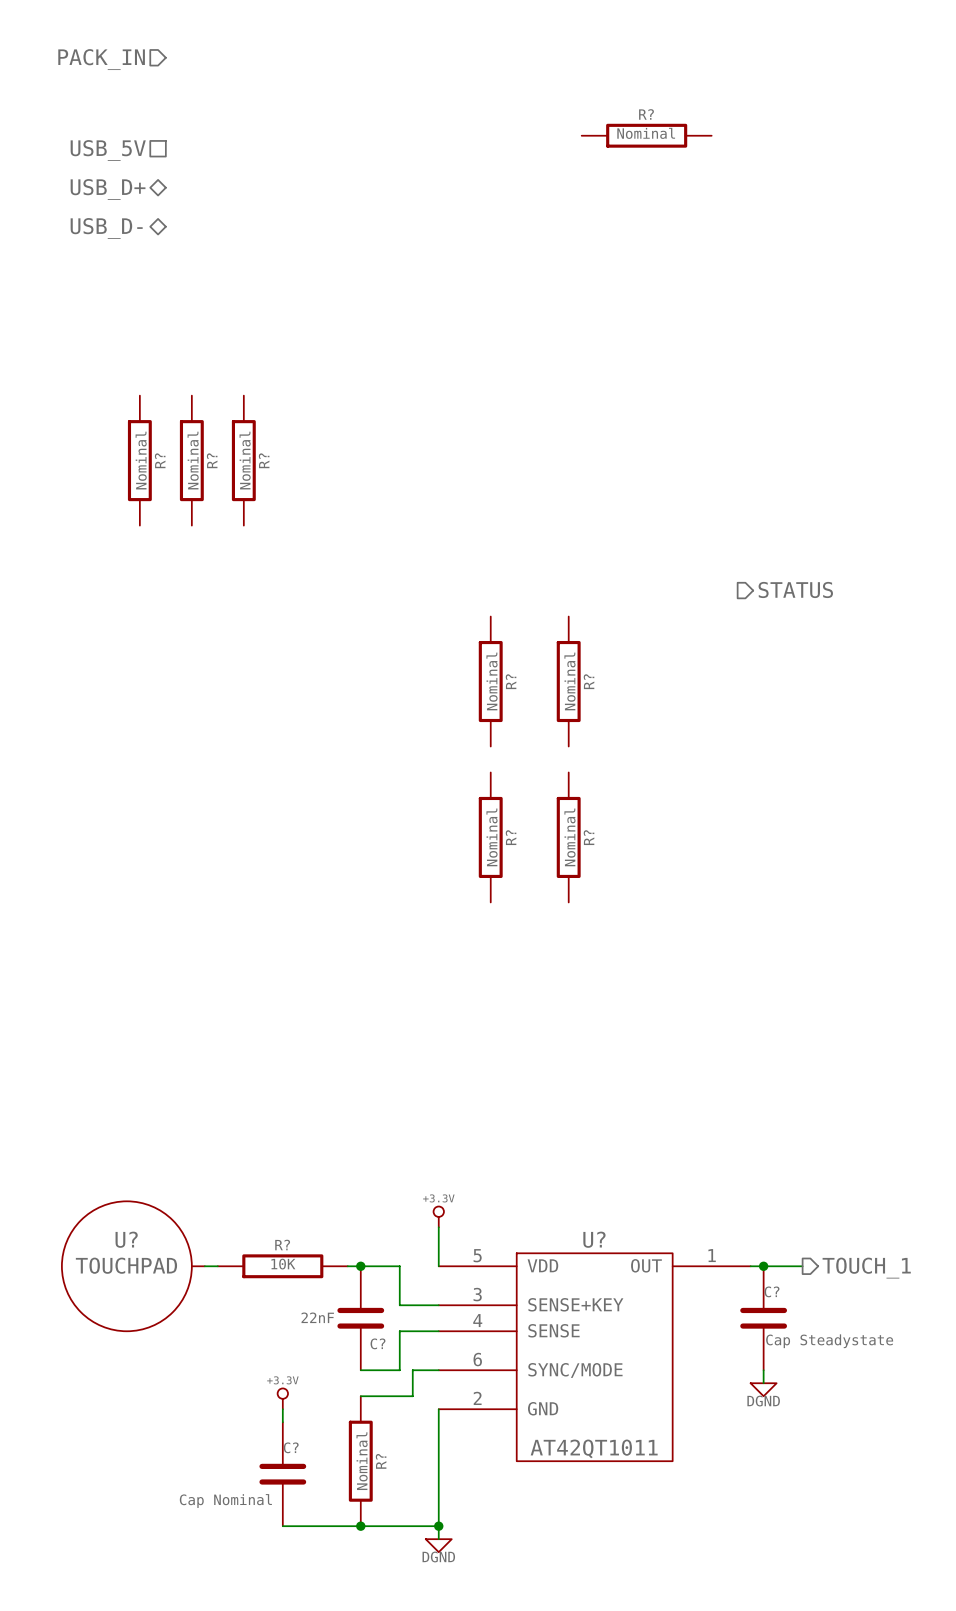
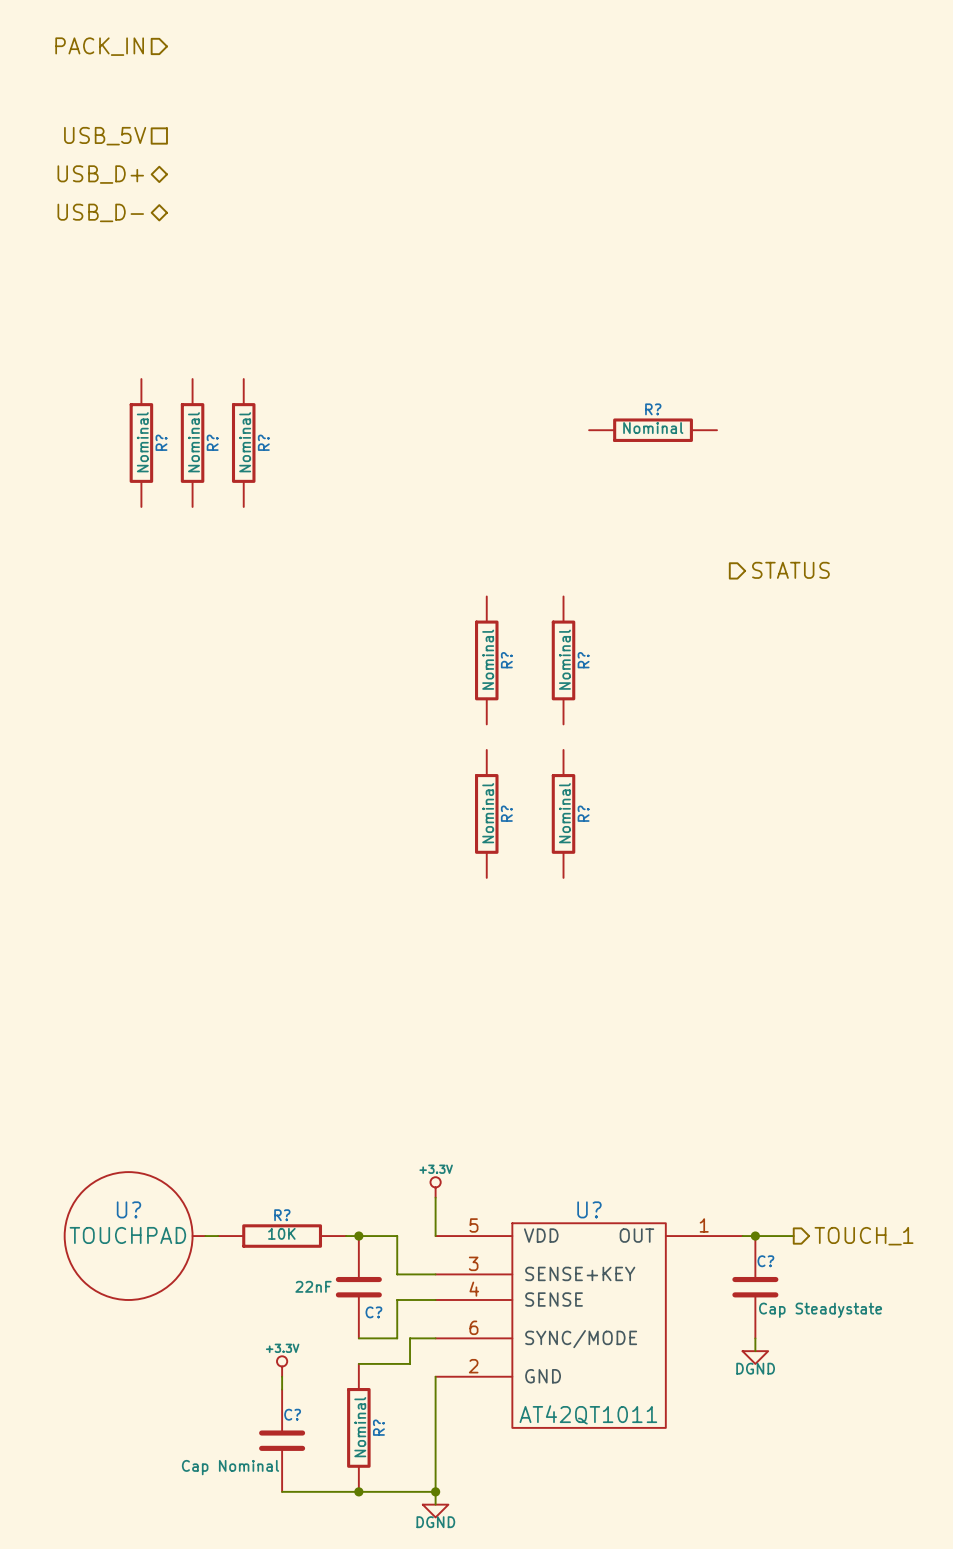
R?: Nominal (646, 135) -> none
R?: none -> Nominal (653, 430)

